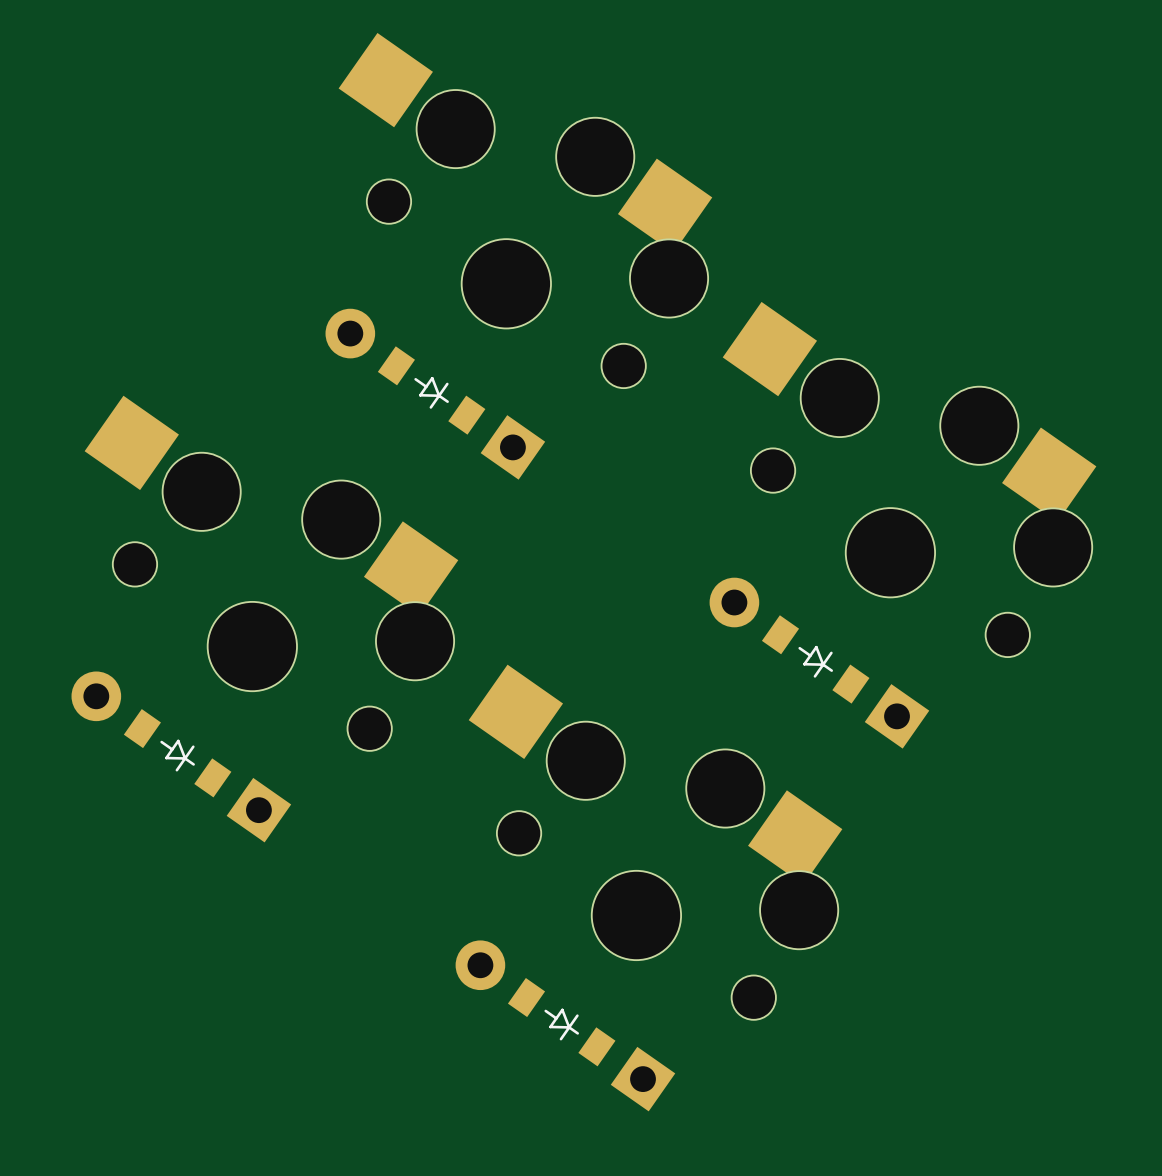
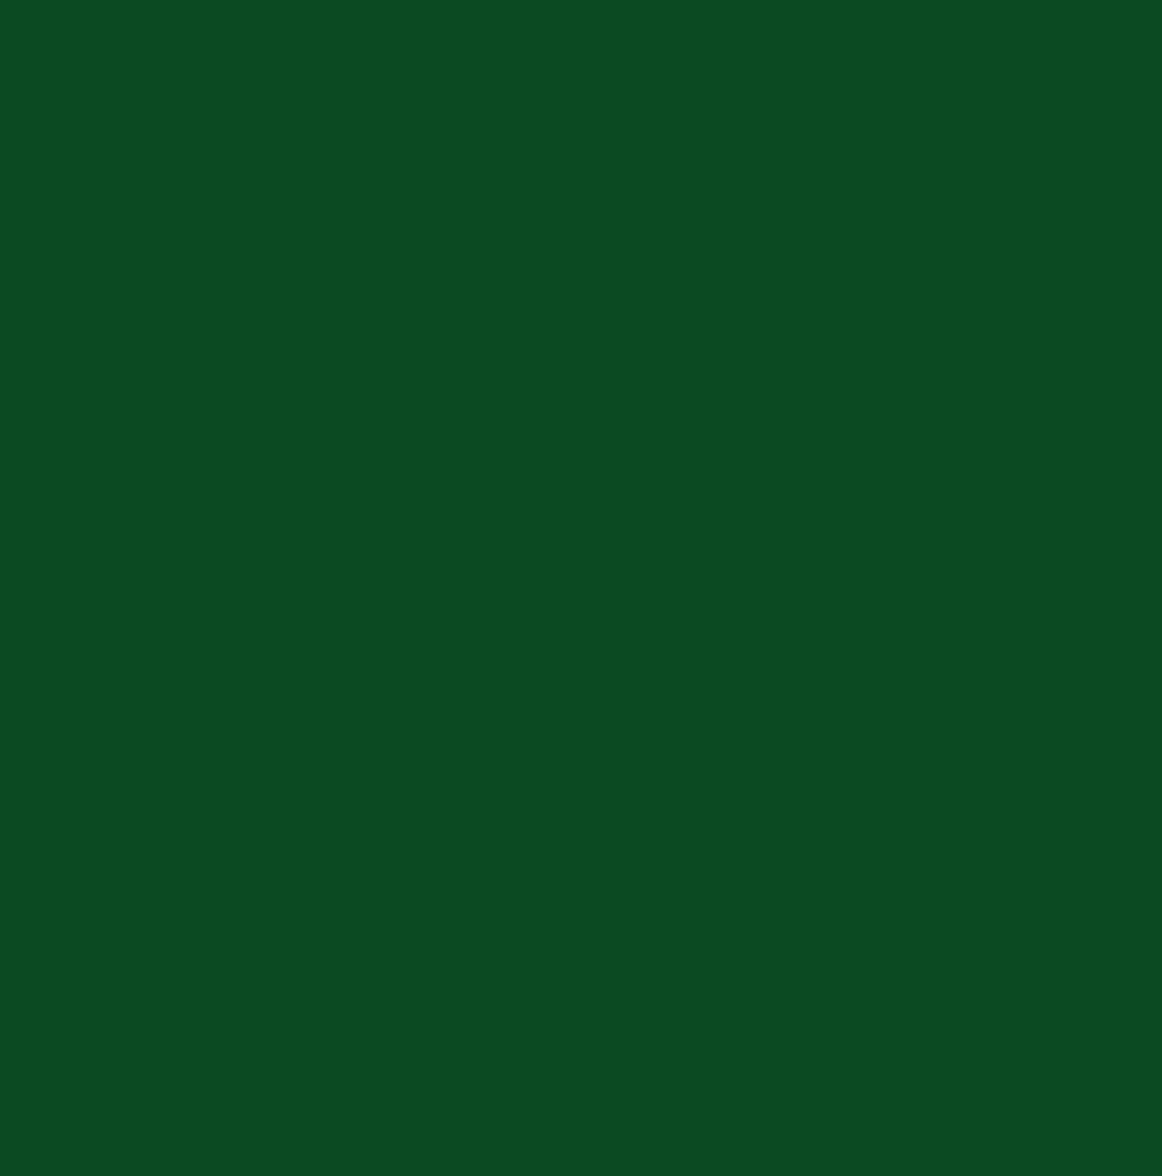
part: (525, 210) -> none
part: (435, 394) -> none
part: (909, 479) -> none
part: (271, 573) -> none
part: (819, 663) -> none
part: (181, 756) -> none
part: (655, 842) -> none
part: (565, 1025) -> none

